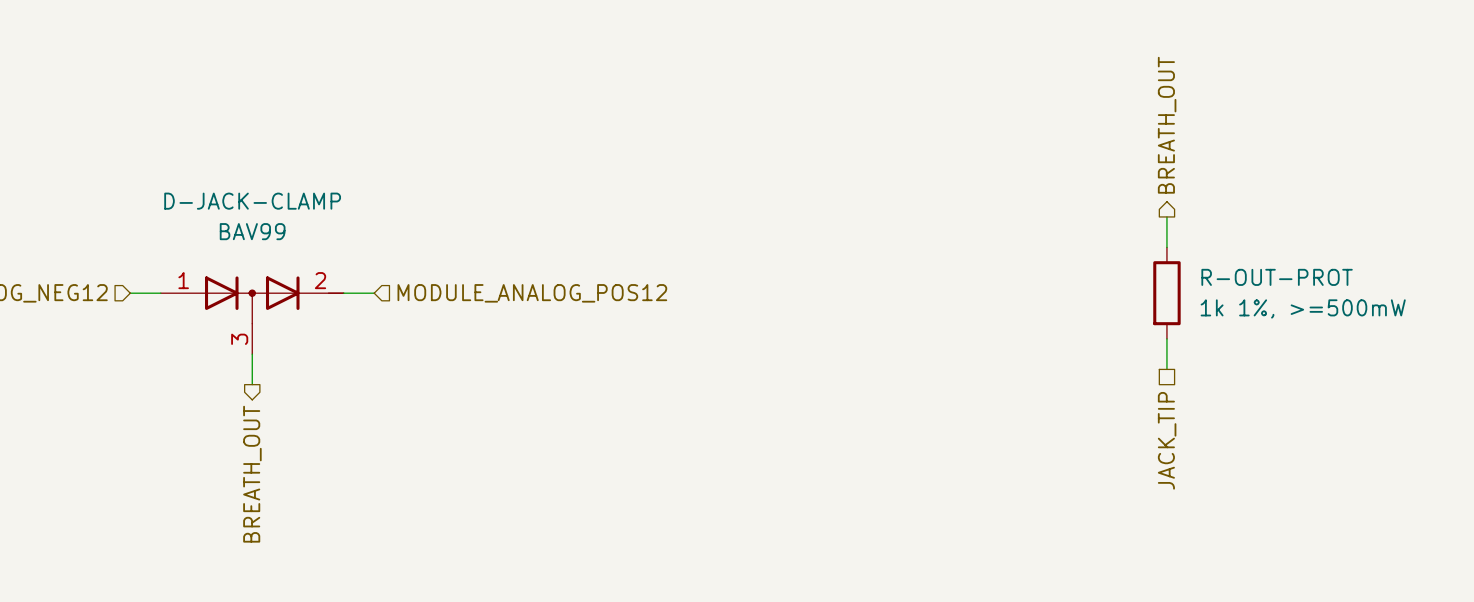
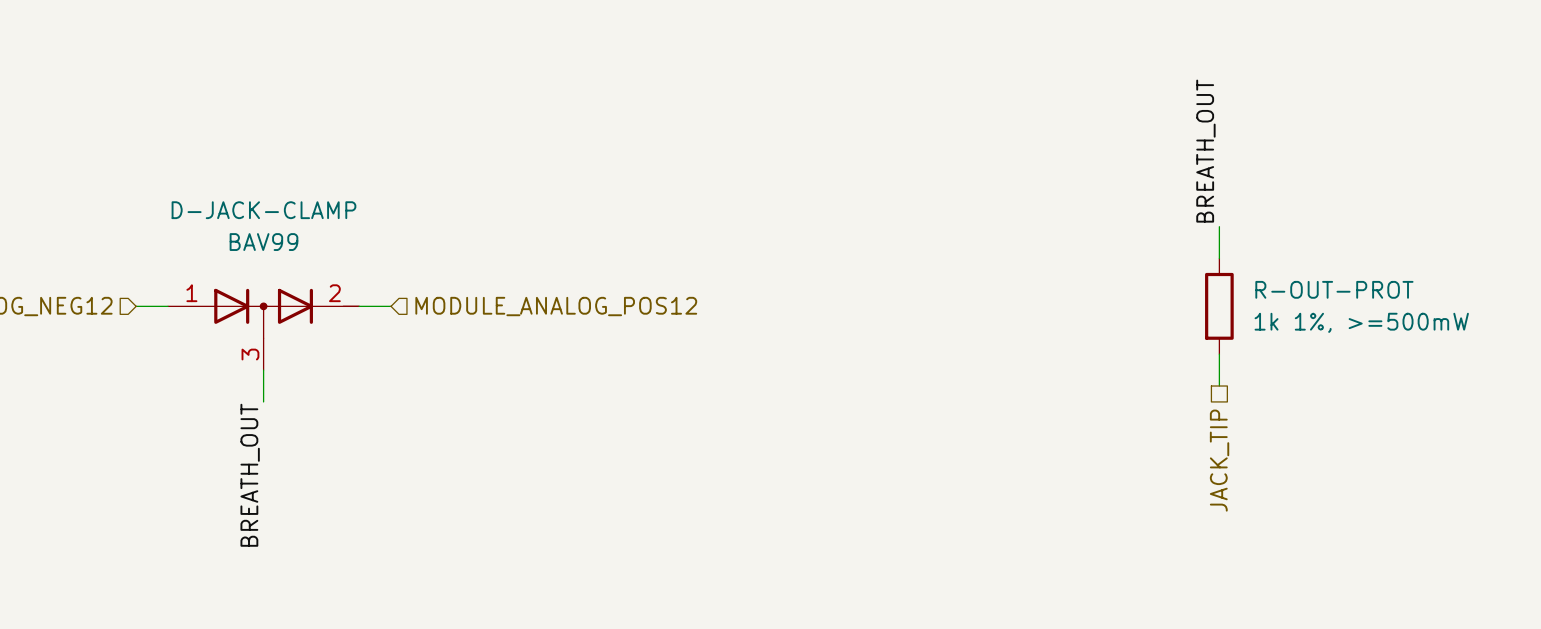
hierarchical label: BREATH_OUT (1167, 125) -> none
label: none -> BREATH_OUT (1205, 151)
label: none -> BREATH_OUT (250, 475)
hierarchical label: BREATH_OUT (252, 474) -> none

